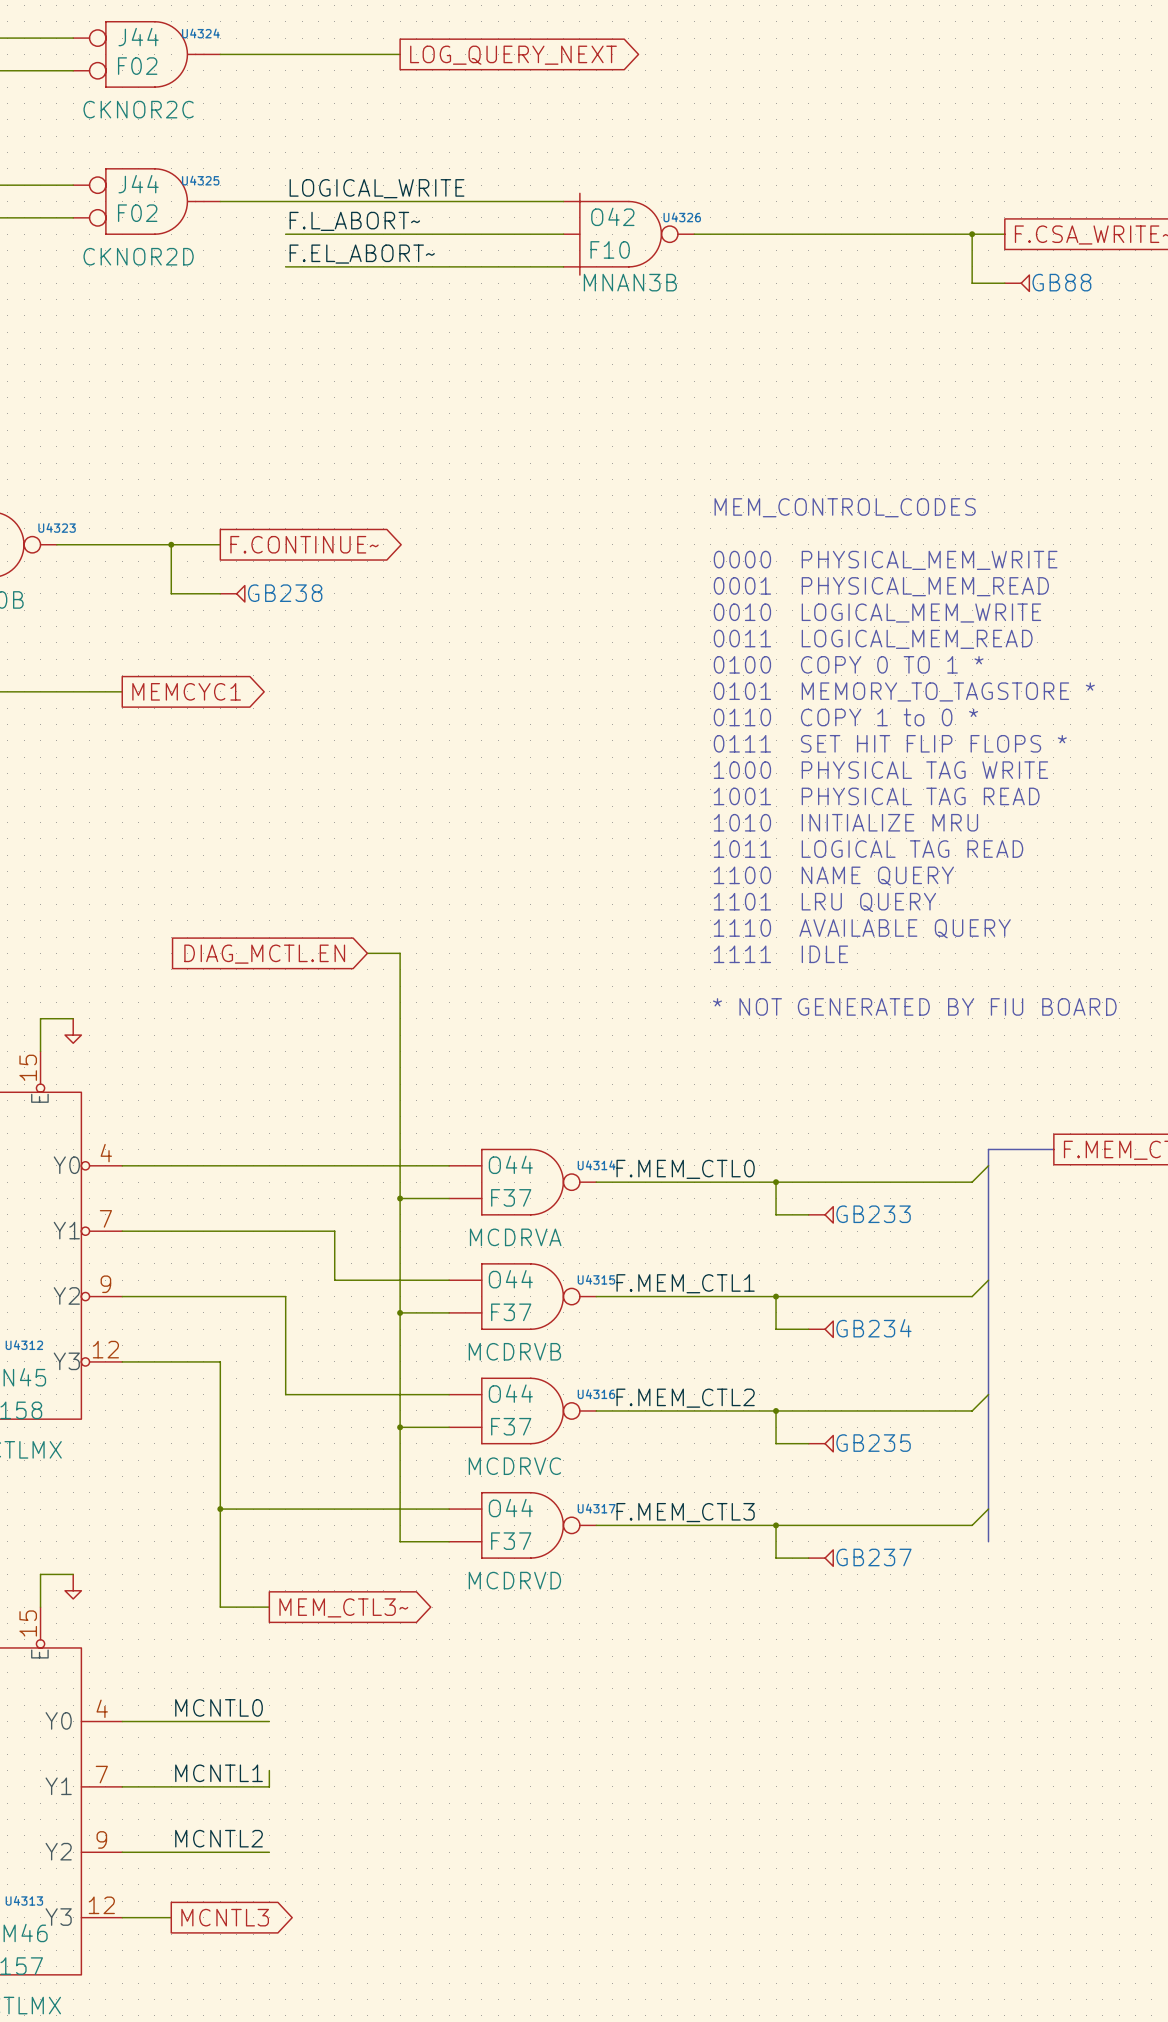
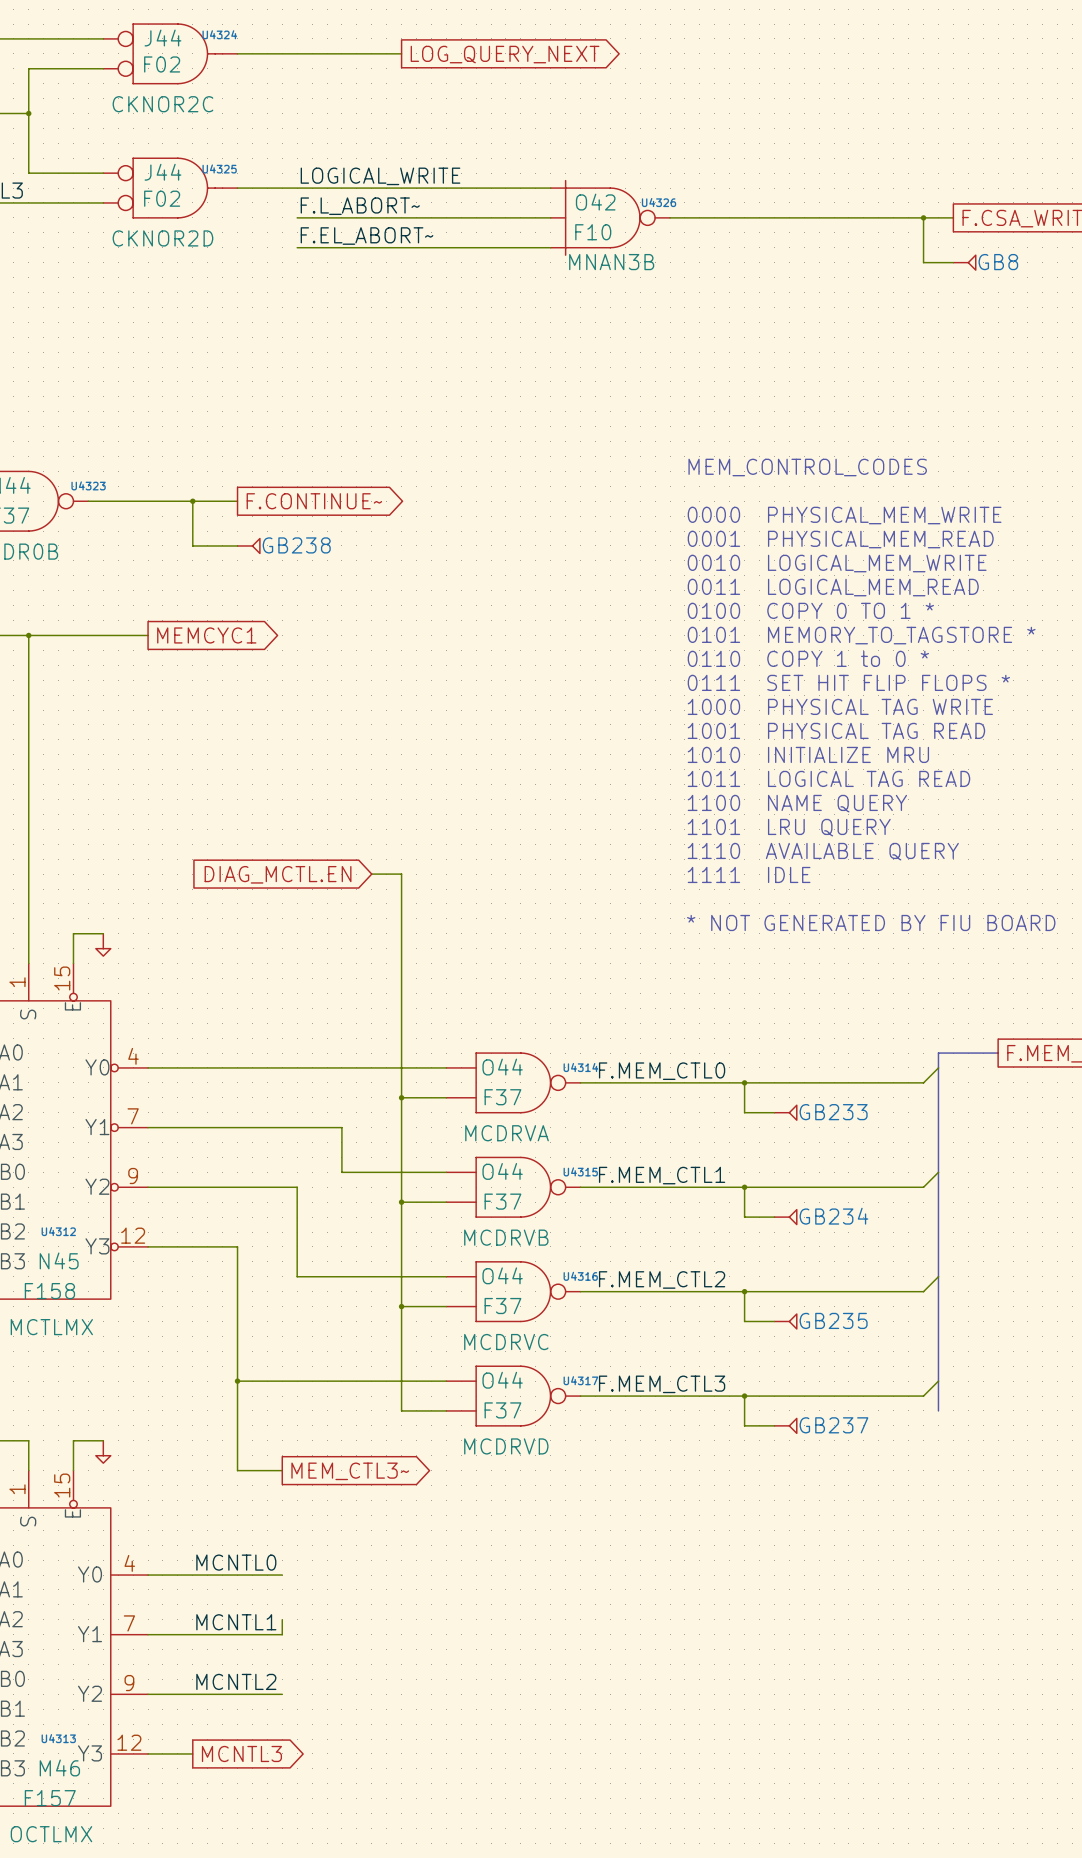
GB88 name: GB88 (1061, 282) -> GB8 (998, 262)

